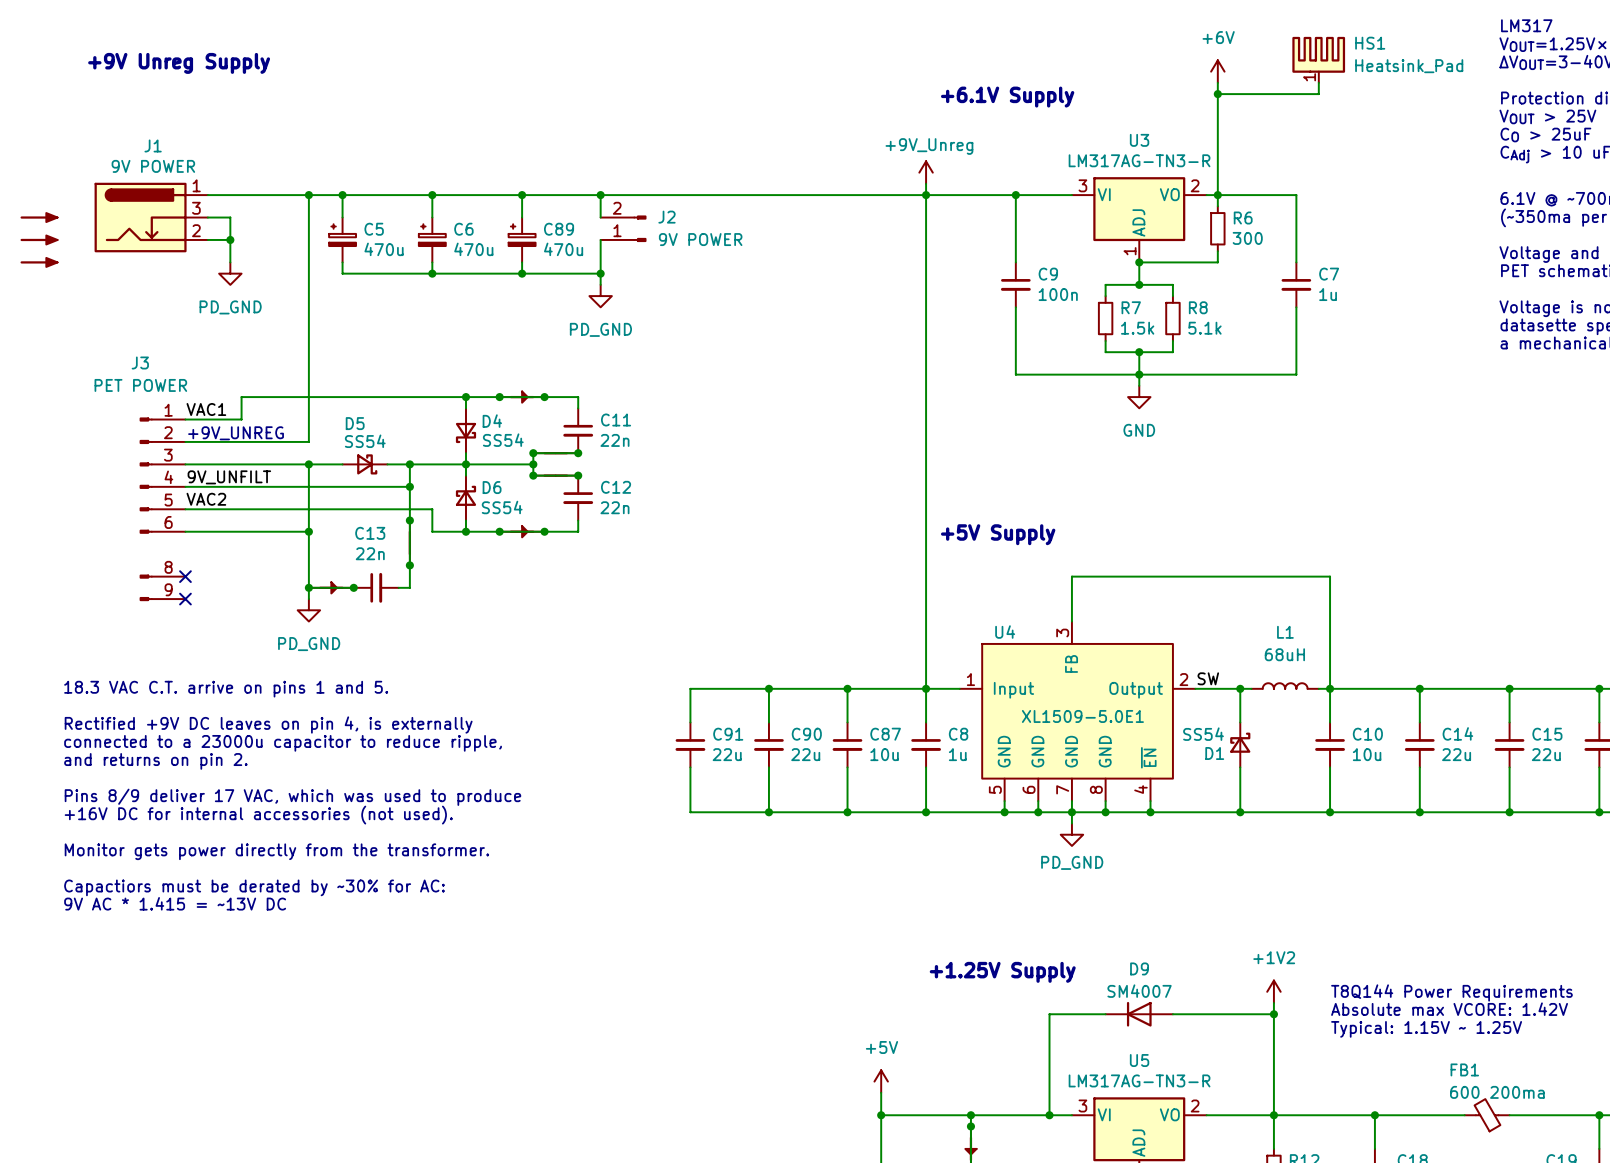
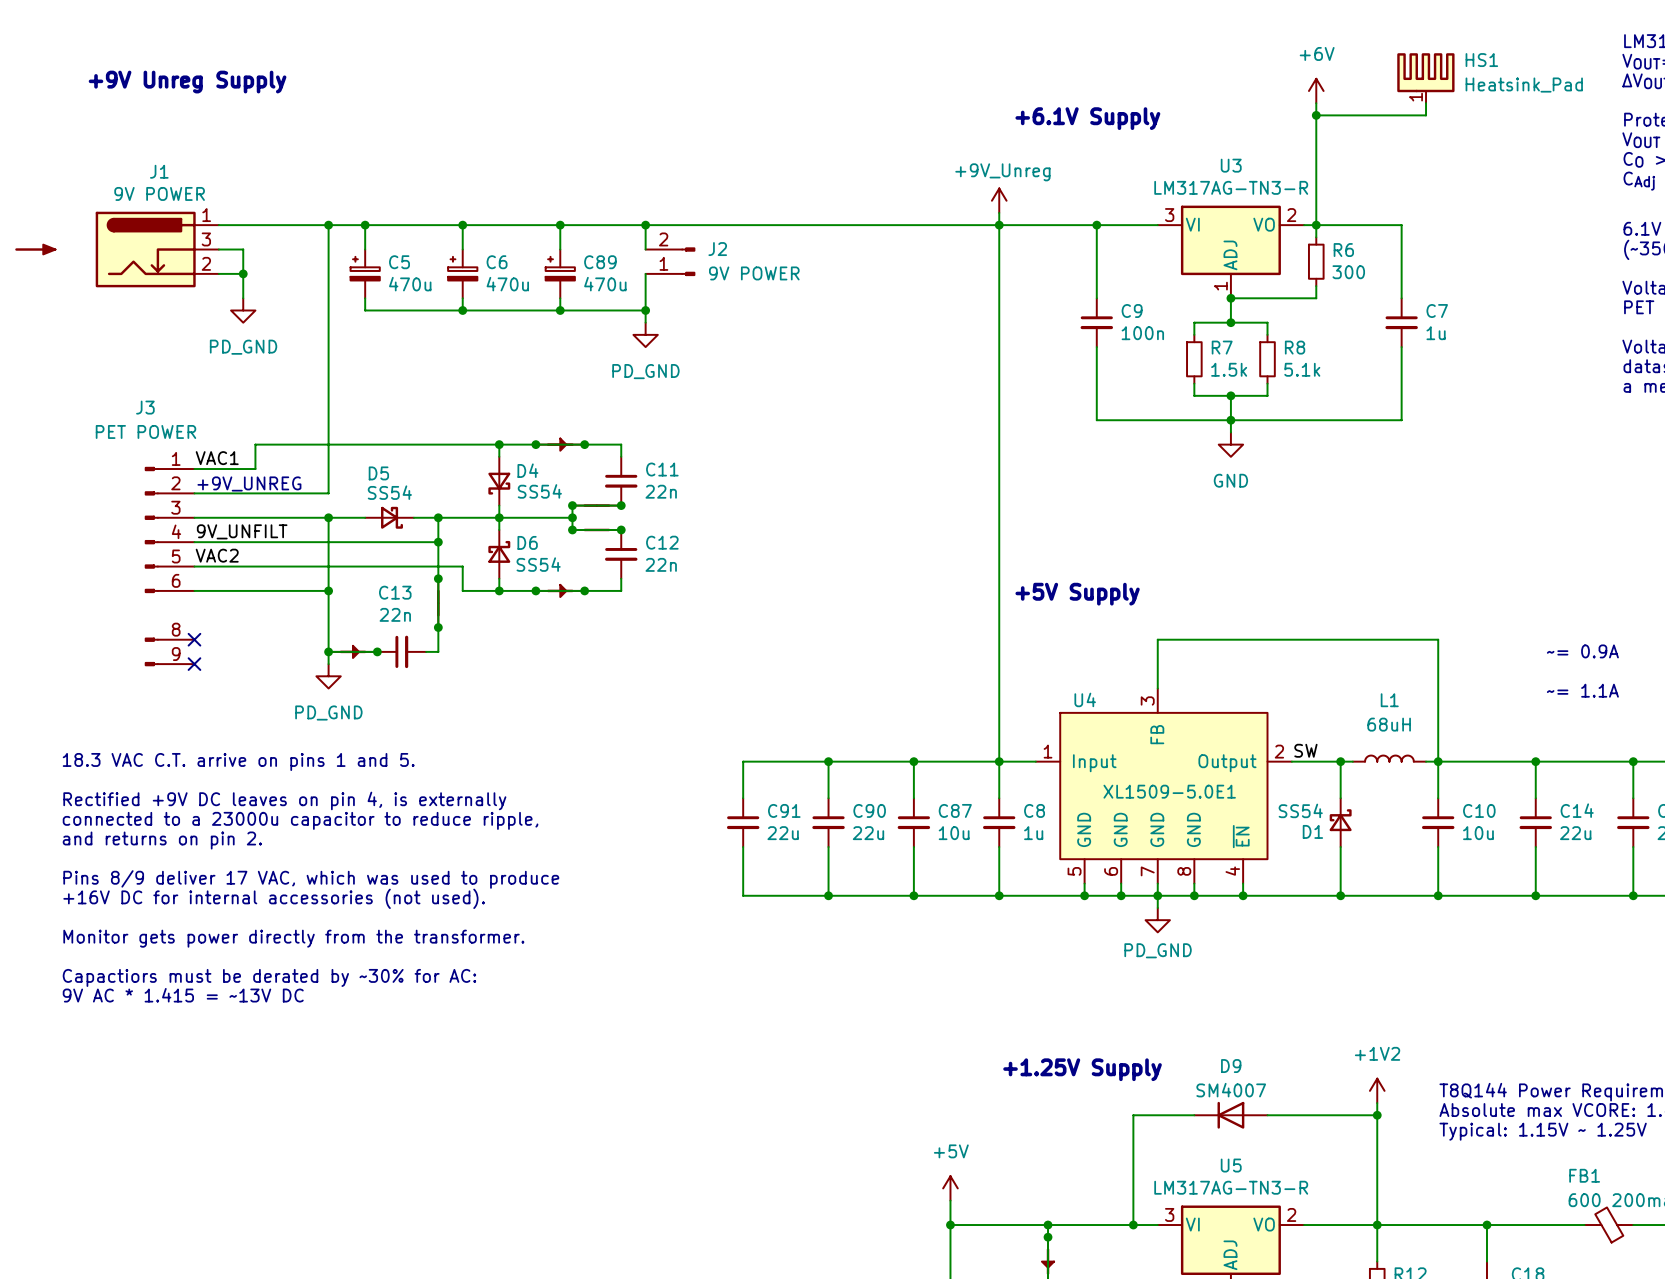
part: (39, 239) -> none
part: (39, 262) -> none
text: none -> ~= 0.9A (1582, 651)
text: none -> ~= 1.1A (1582, 690)

